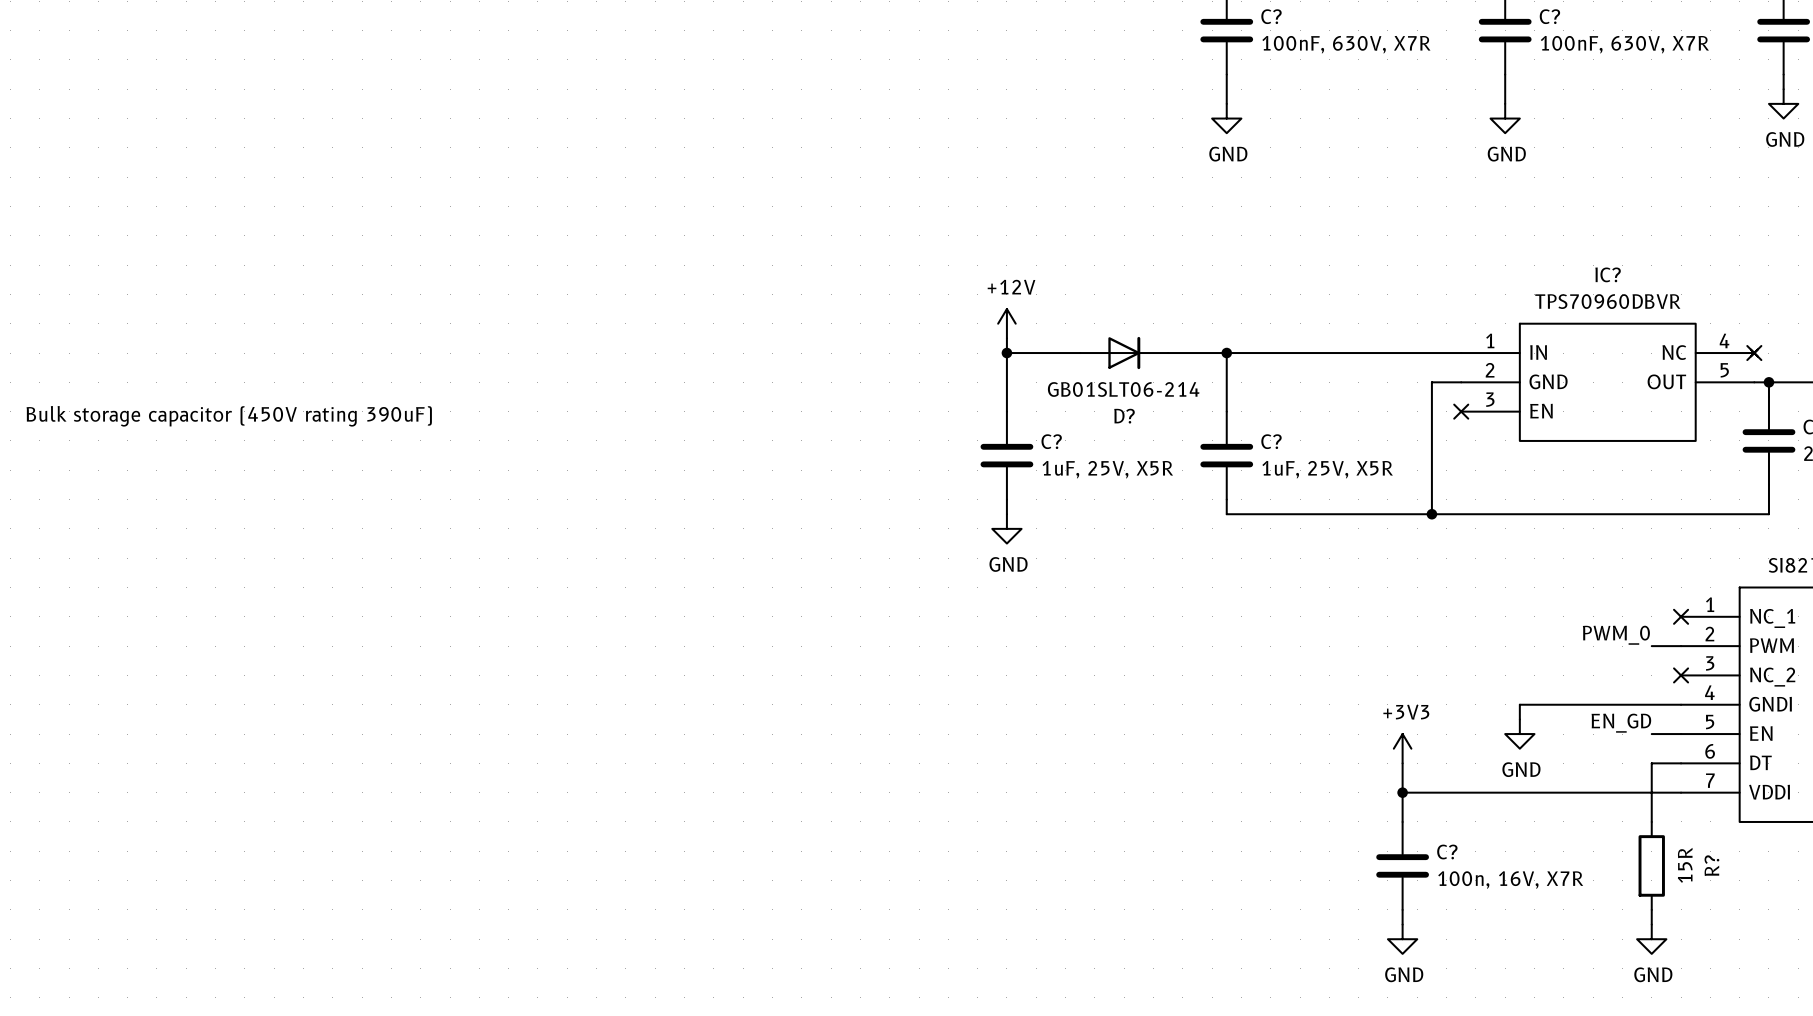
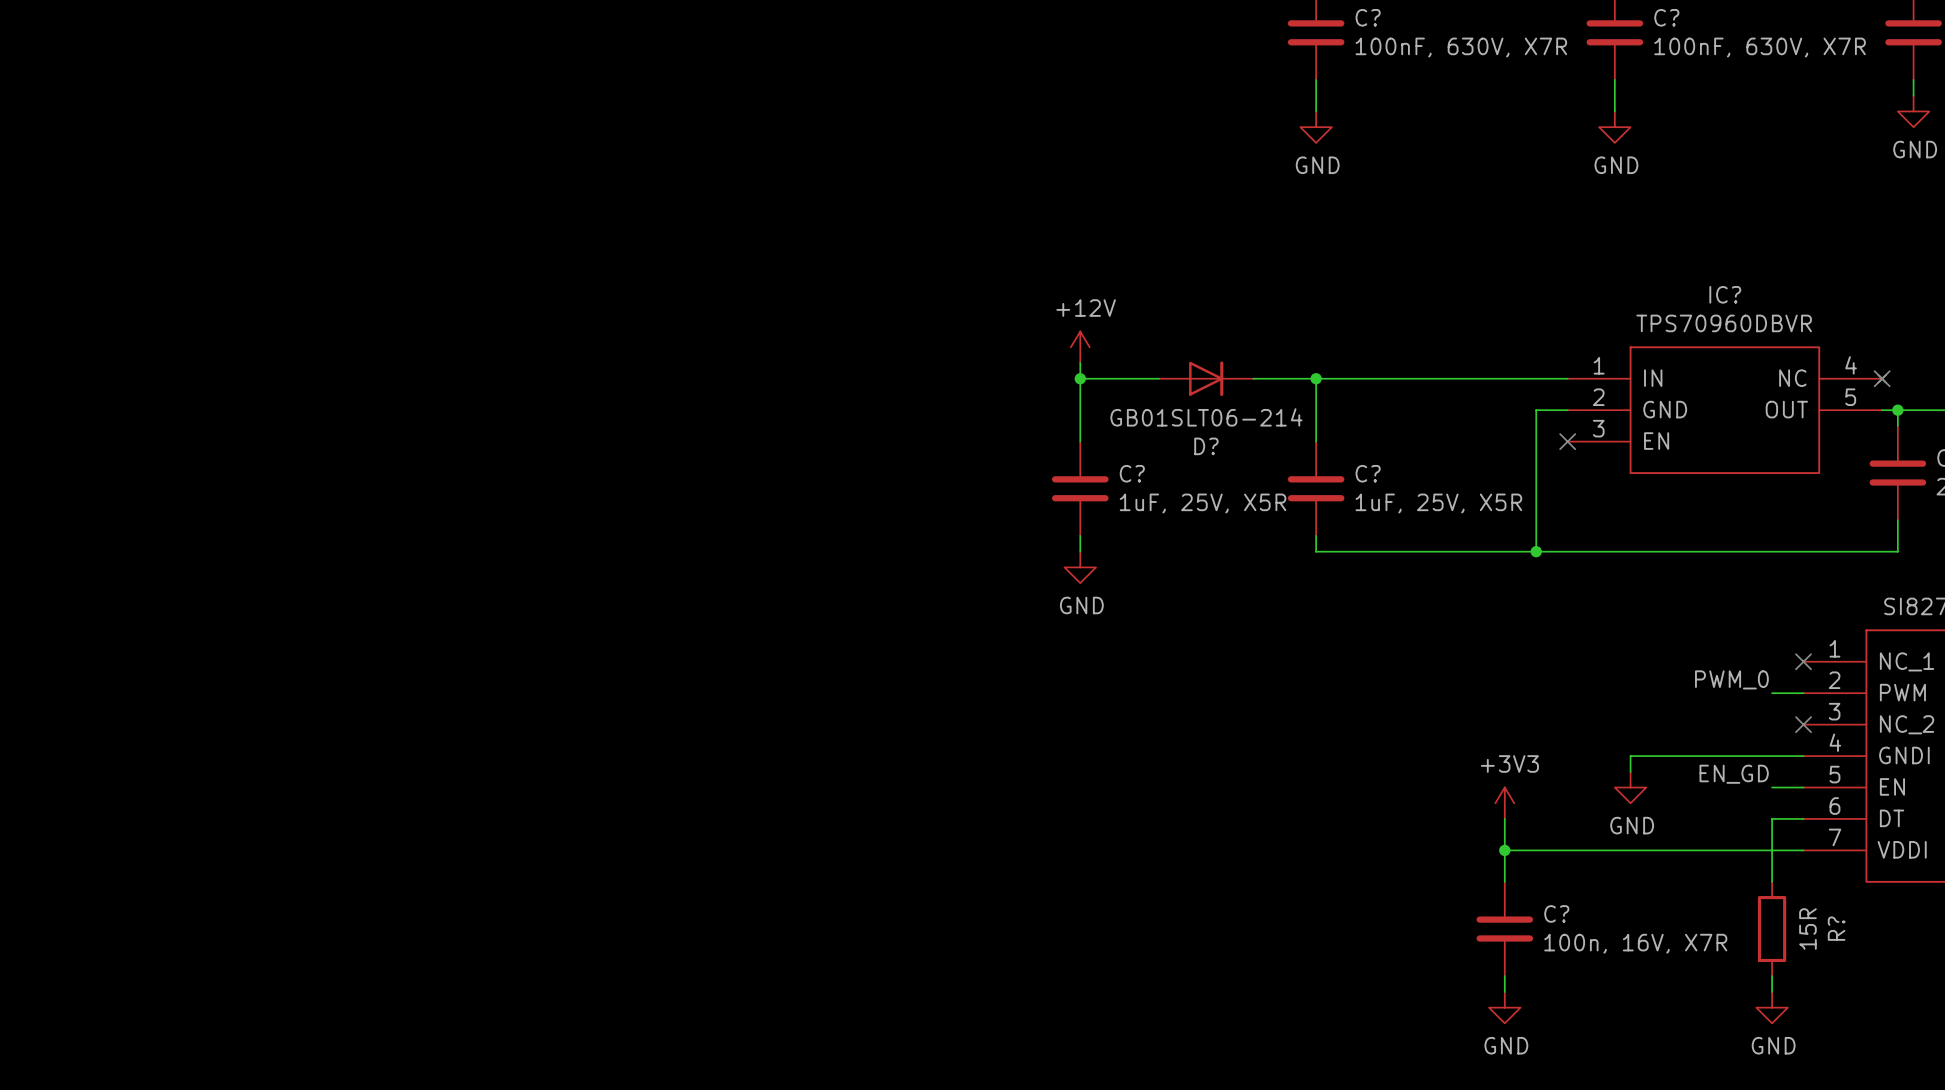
text: Bulk storage capacitor (450V rating 390uF) (229, 416) -> none

